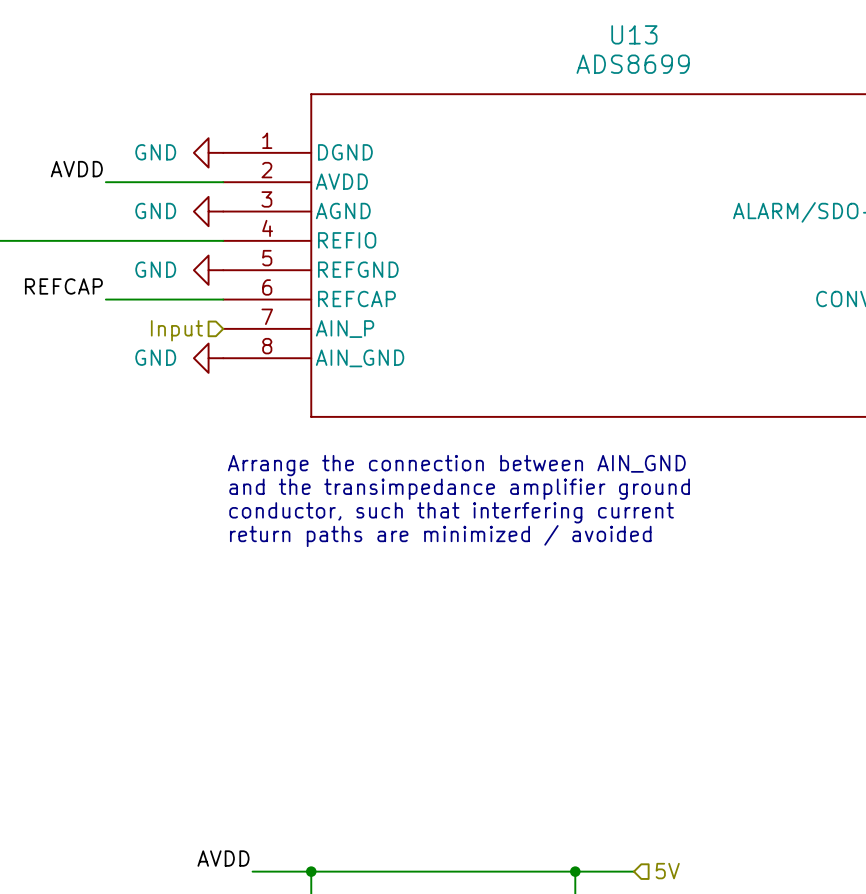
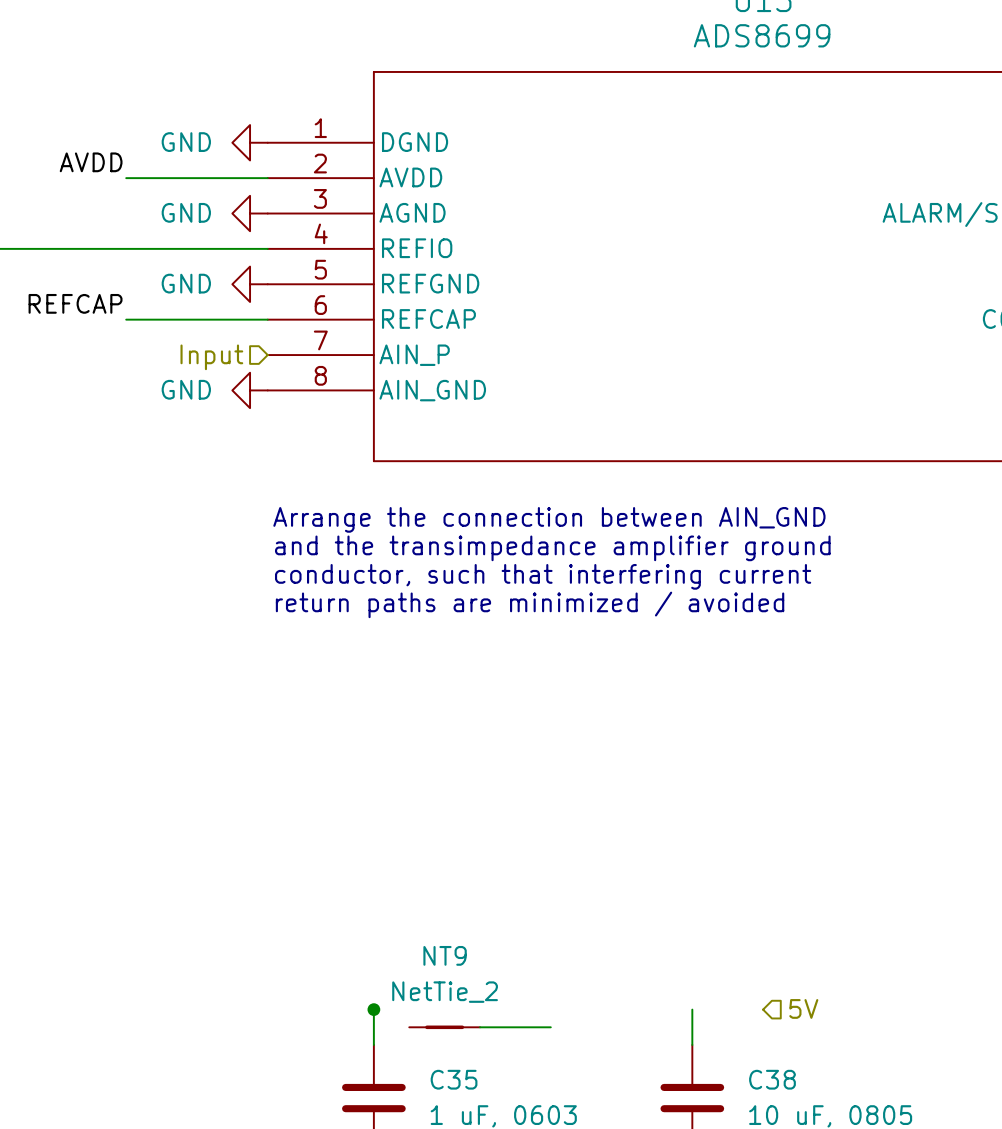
label: AVDD (223, 858) -> none
wire: (252, 871) (633, 871) -> none
junction: (575, 871) -> none
NT9: none -> NetTie_2 (444, 1027)
wire: none -> (480, 1027) (550, 1027)

